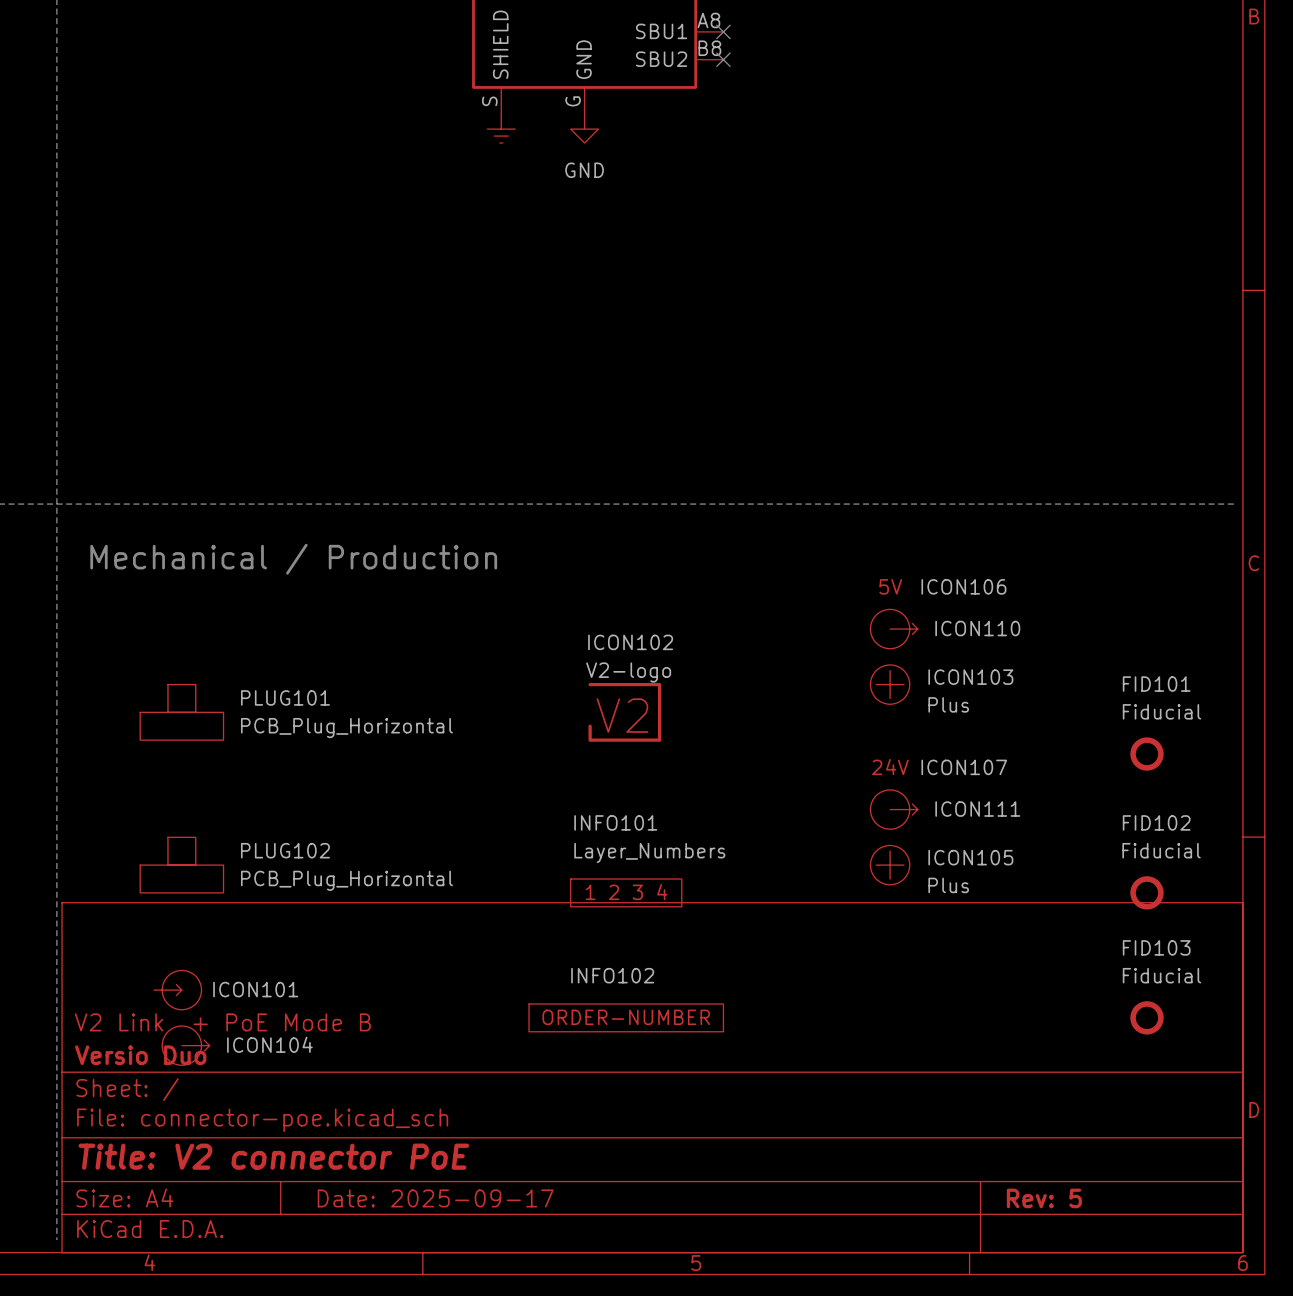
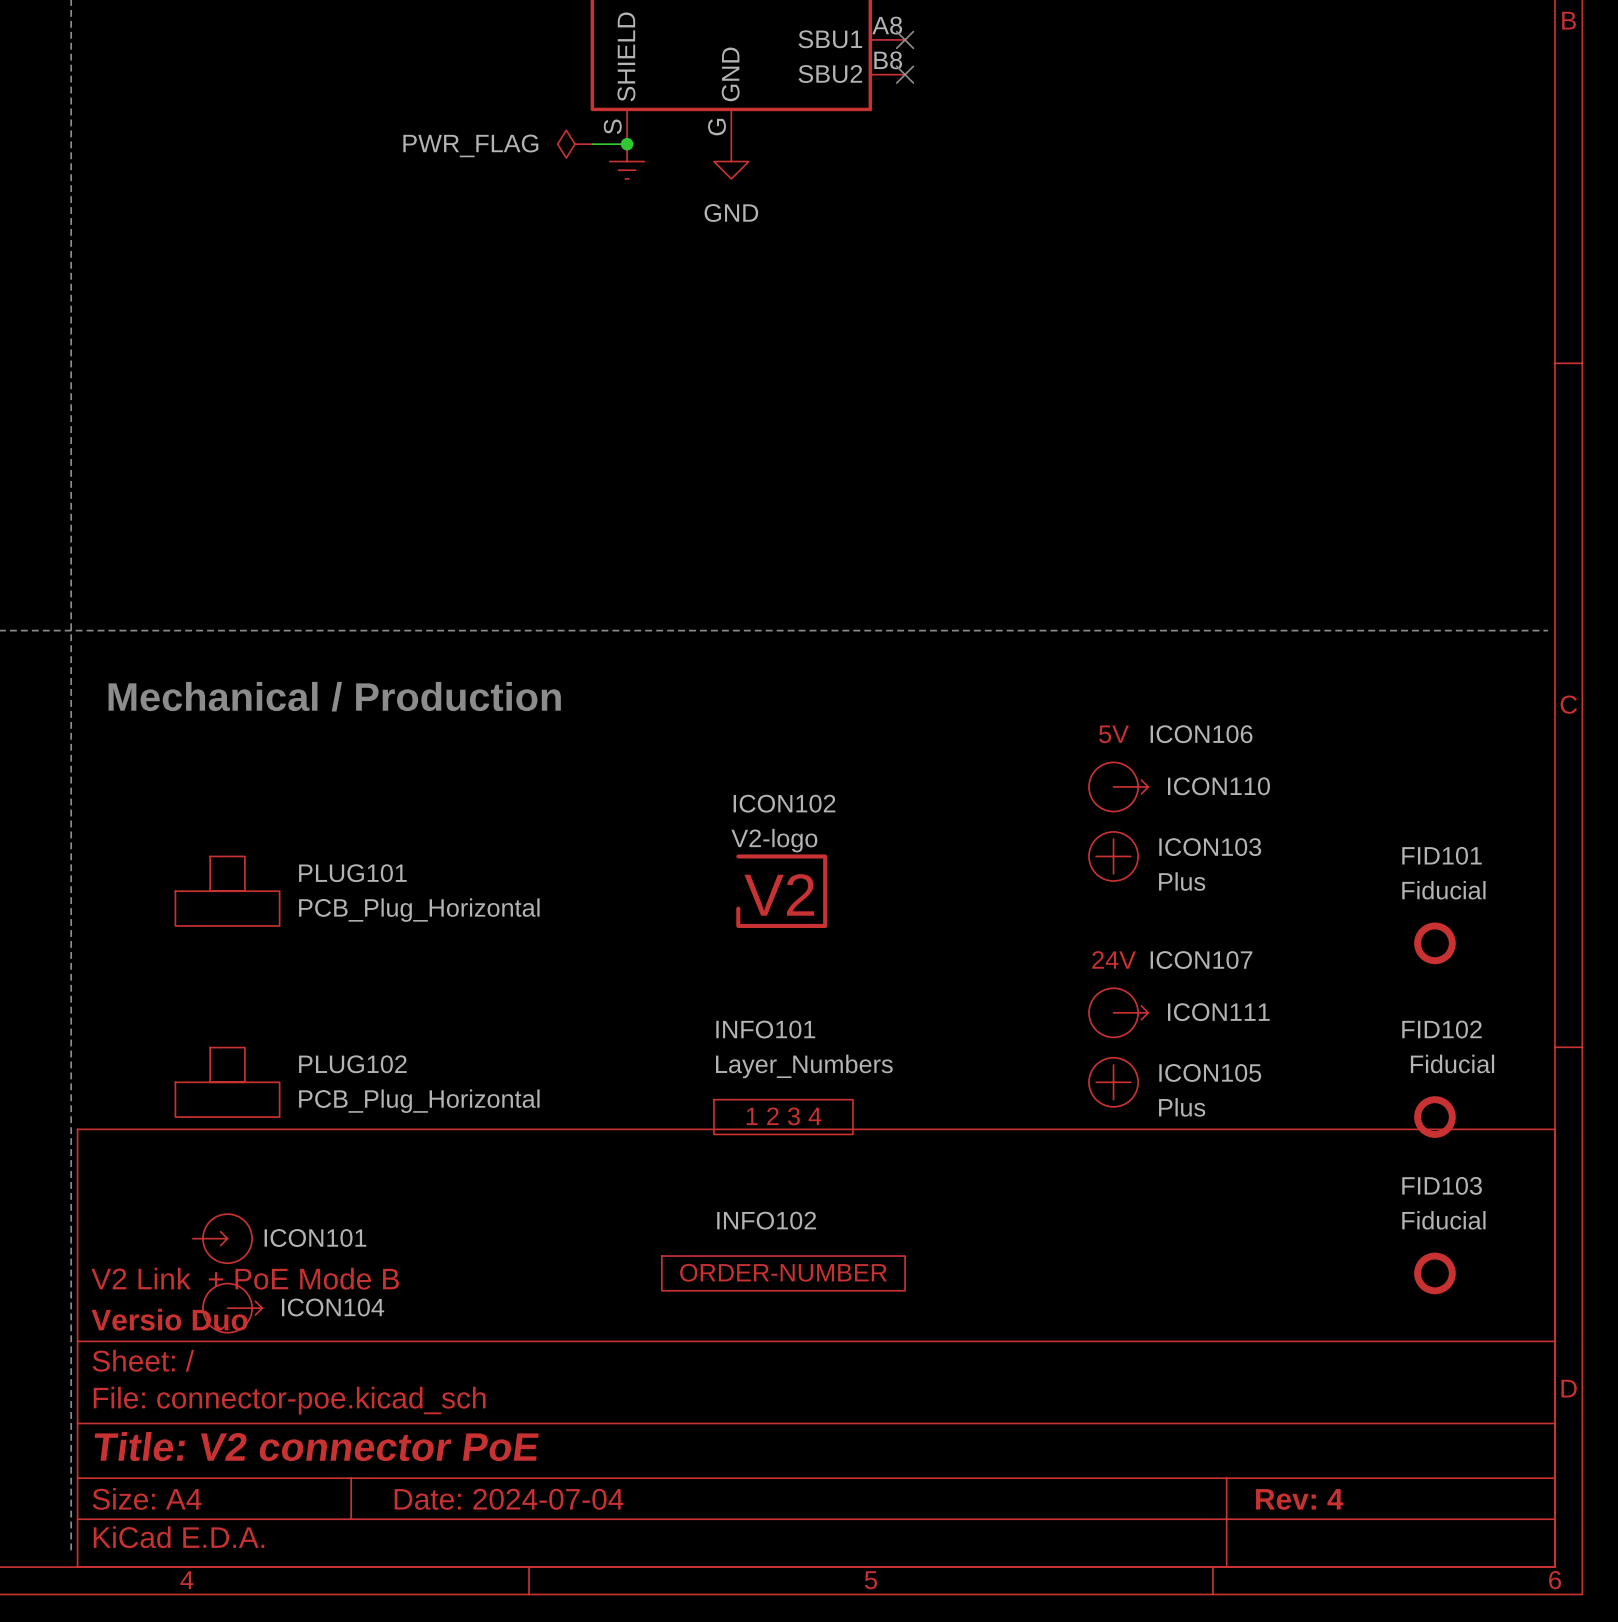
power symbol: none -> PWR_FLAG (574, 144)
wire: none -> (592, 144) (627, 144)
junction: none -> (627, 144)
title block: Date: 2025-09-17 (435, 1198) -> Date: 2024-07-04 (509, 1499)
title block: Rev: 5 (1044, 1198) -> Rev: 4 (1299, 1499)

